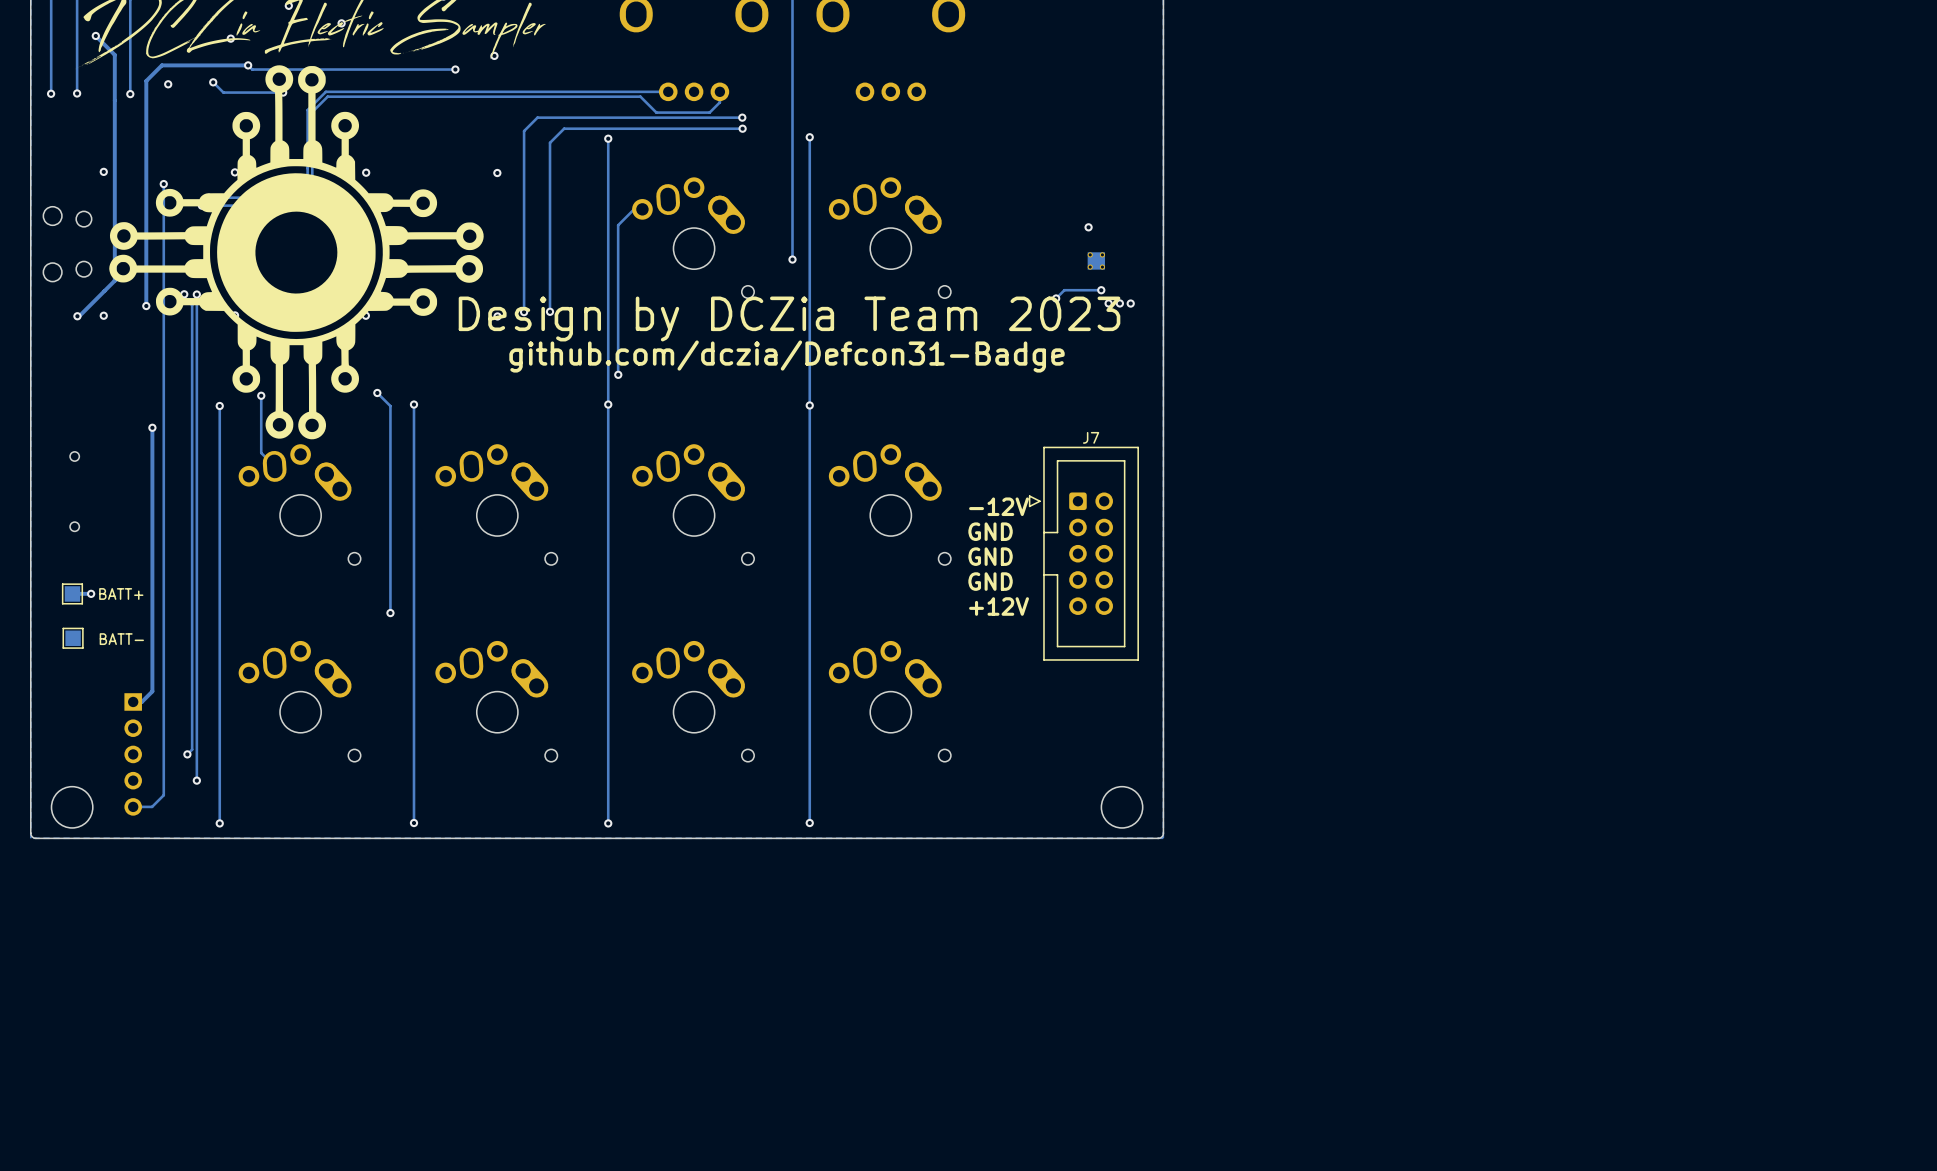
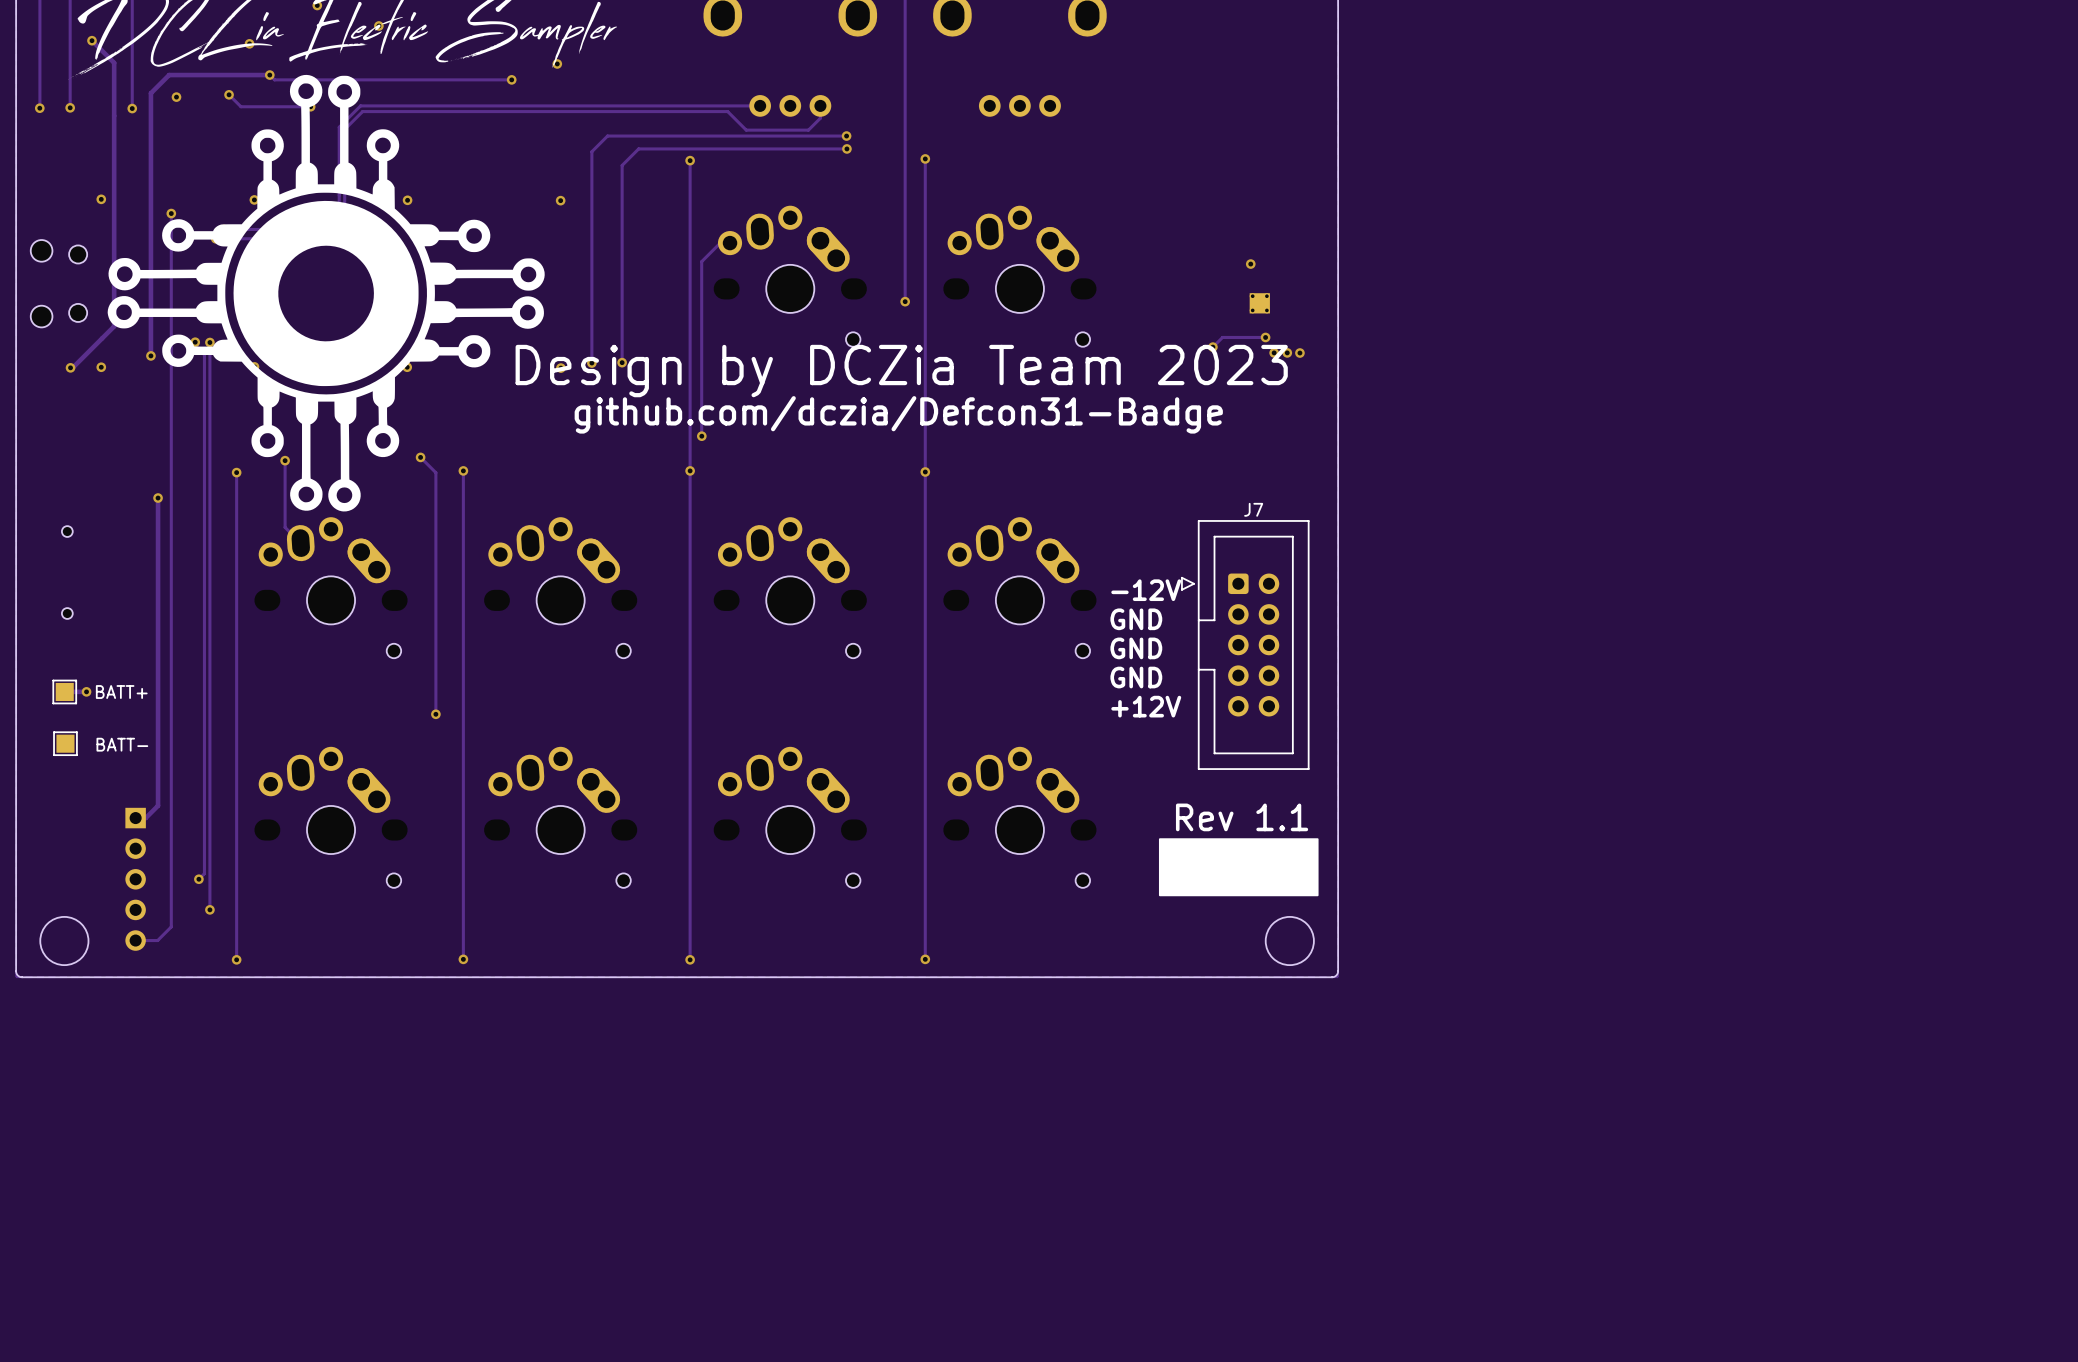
text: none -> Rev 1.1 (1242, 817)
drawing: none -> [1158, 838, 1319, 897]

